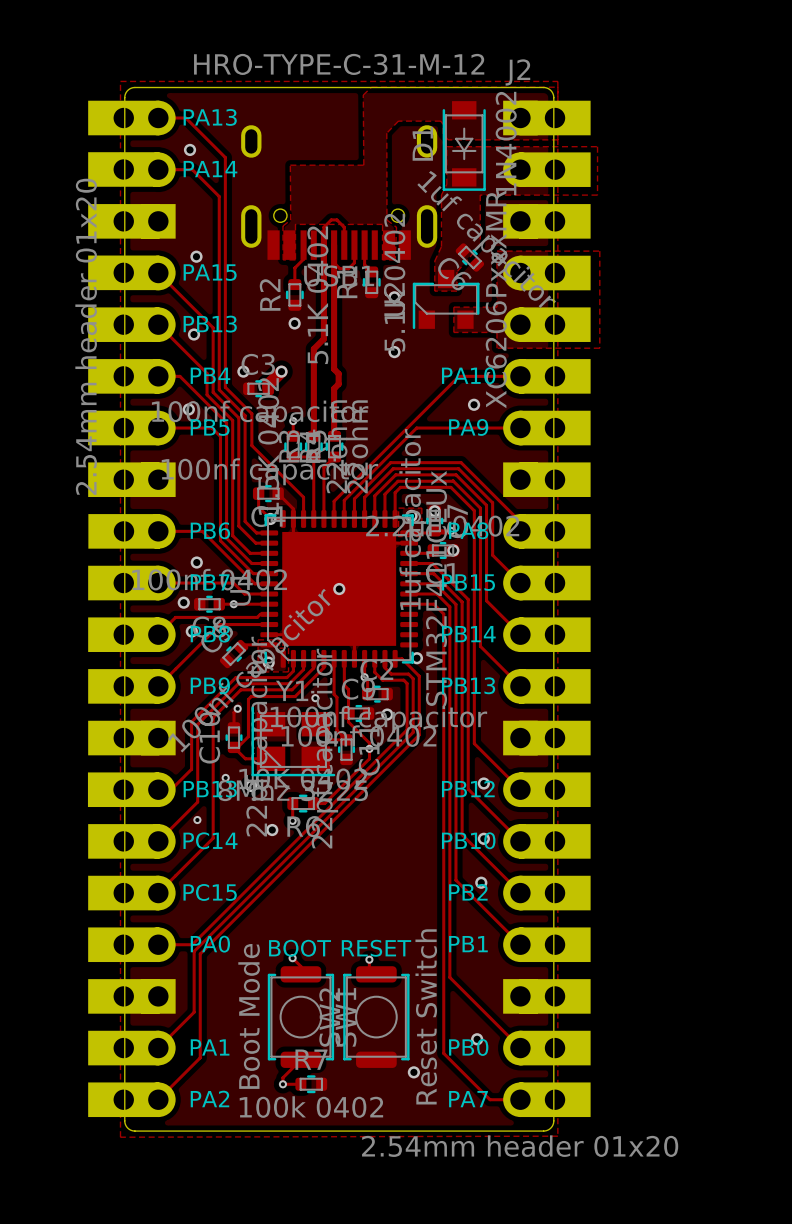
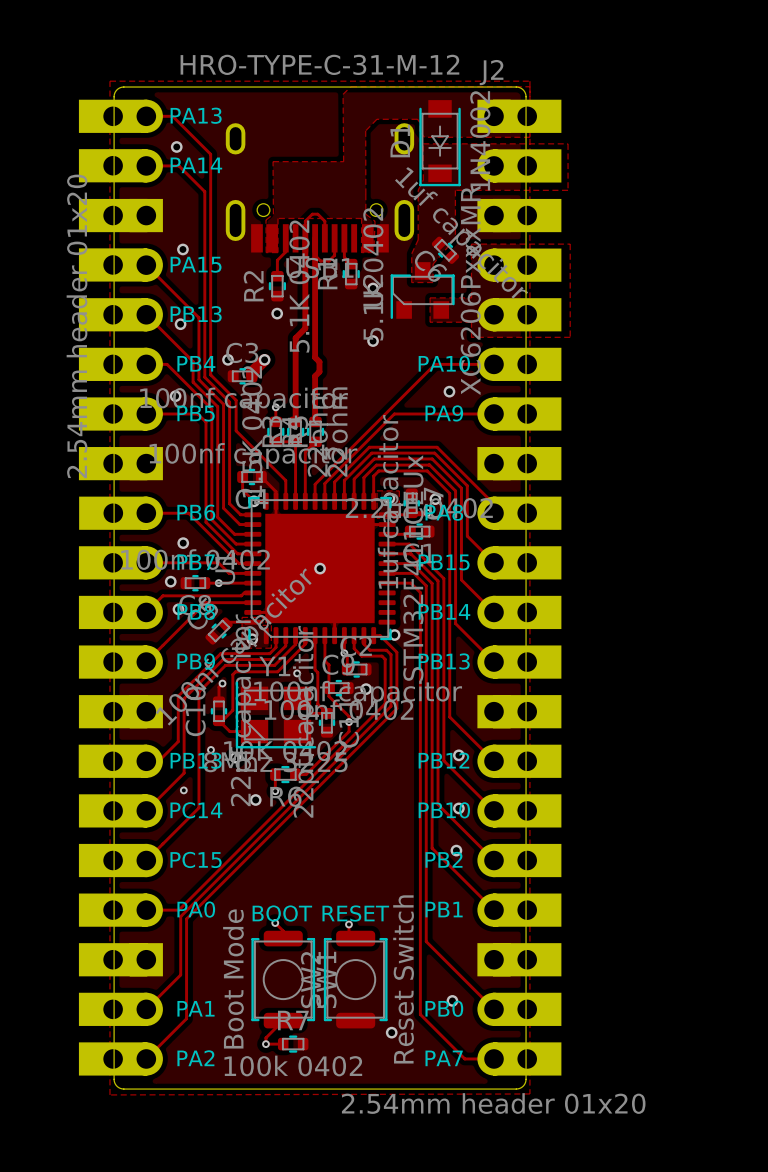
via: (434, 511) -> none
via: none -> (435, 499)
via: (453, 550) -> none

